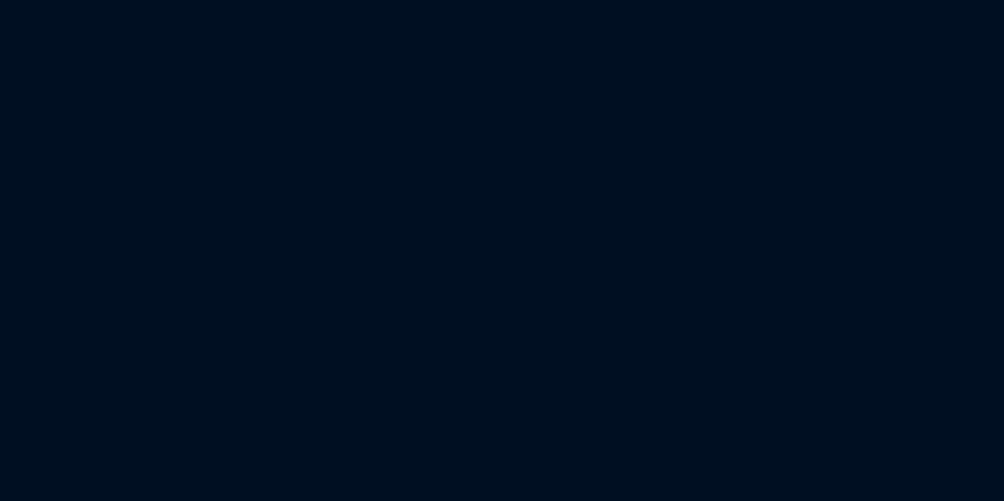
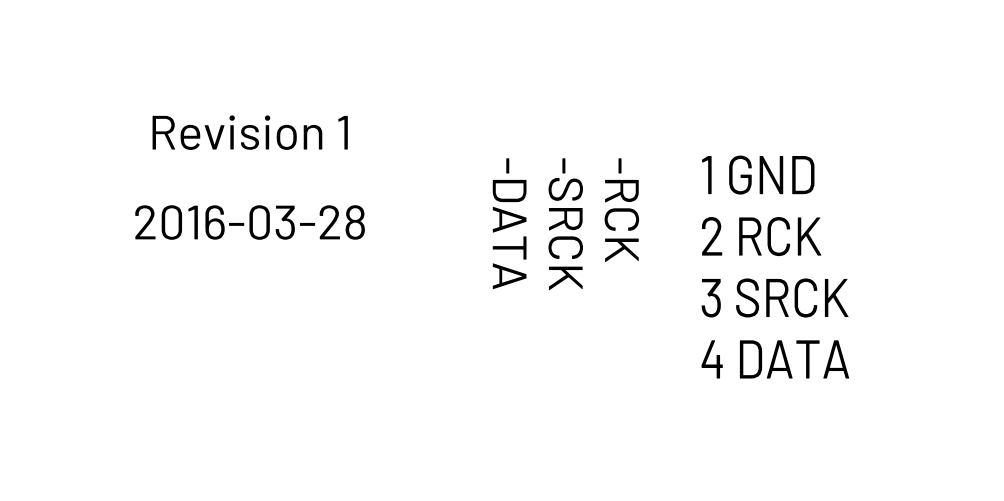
text: none -> Revision 1 (250, 132)
text: none -> 1 GND (758, 175)
text: none -> -RCK (621, 210)
text: none -> 2016-03-28 (250, 222)
text: none -> -DATA (509, 223)
text: none -> -SRCK (565, 224)
text: none -> 2 RCK (761, 236)
text: none -> 3 SRCK (775, 298)
text: none -> 4 DATA (775, 359)

